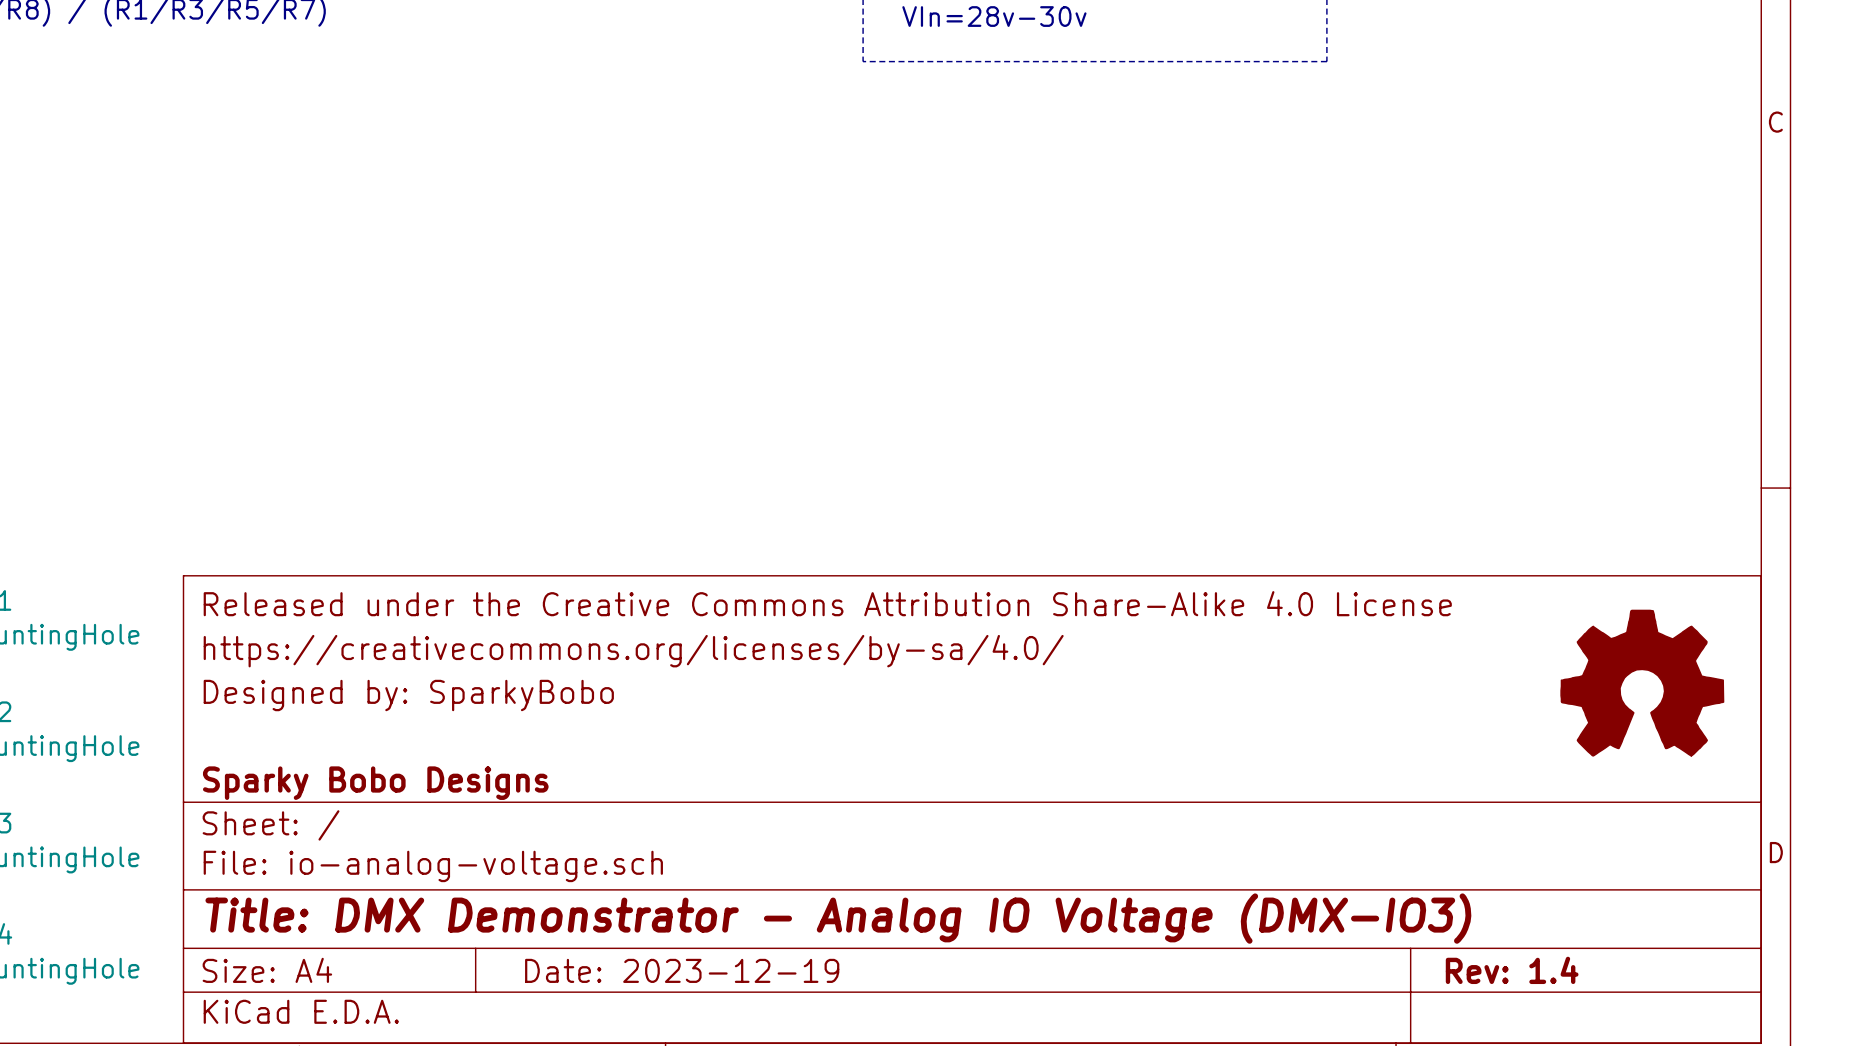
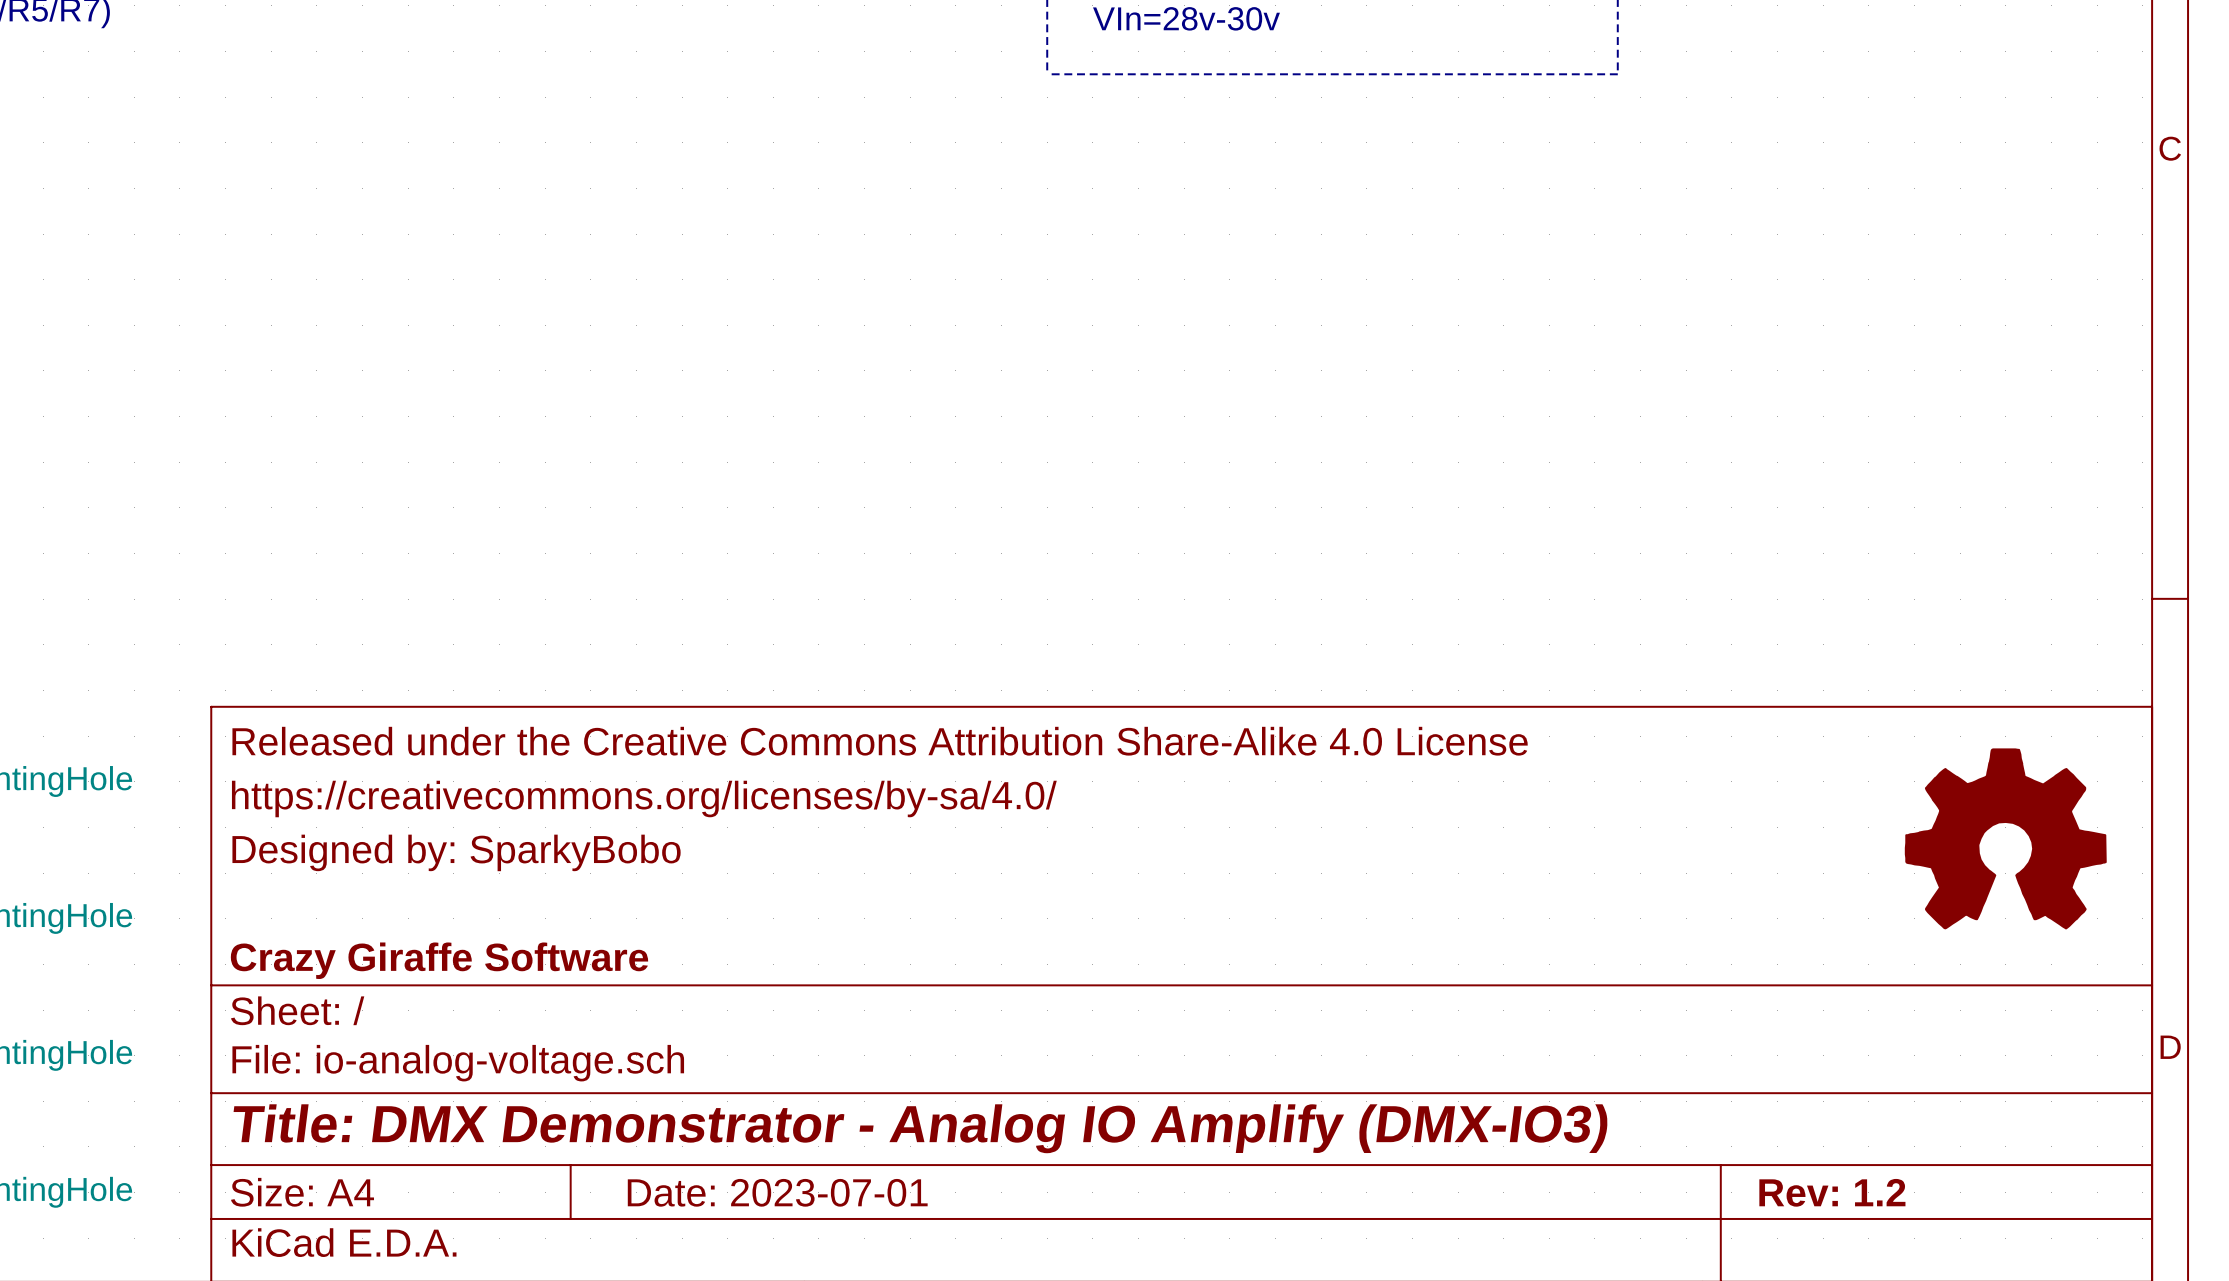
title block: Sparky Bobo Designs (375, 783) -> Crazy Giraffe Software (439, 960)
title block: Title: DMX Demonstrator - Analog IO Voltage (DMX-IO3) (838, 918) -> Title: DMX Demonstrator - Analog IO Amplify (DMX-IO3) (920, 1128)
title block: Date: 2023-12-19 (682, 970) -> Date: 2023-07-01 (777, 1192)
title block: Rev: 1.4 (1512, 970) -> Rev: 1.2 (1832, 1192)

